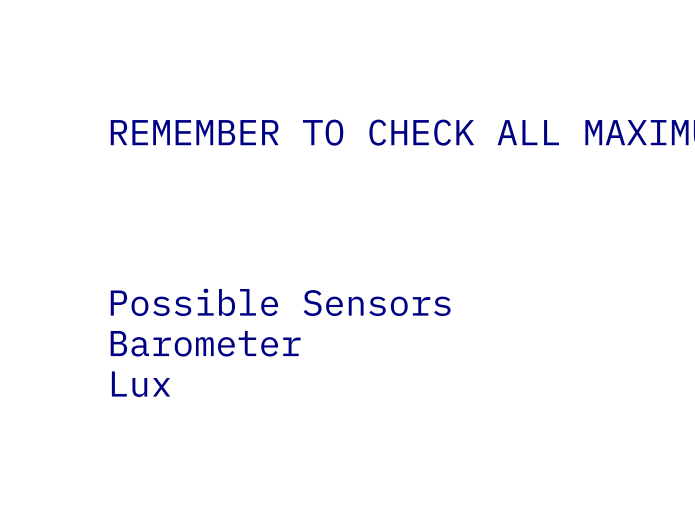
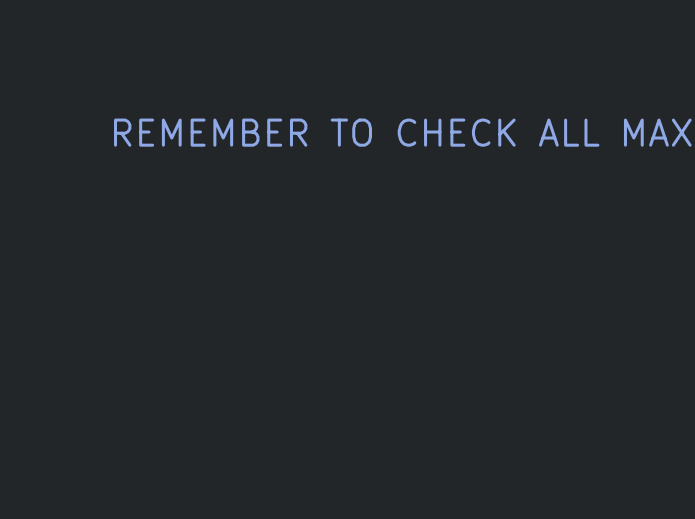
text: Possible Sensors (280, 302) -> none
text: Barometer (205, 343) -> none
text: Lux (141, 384) -> none

